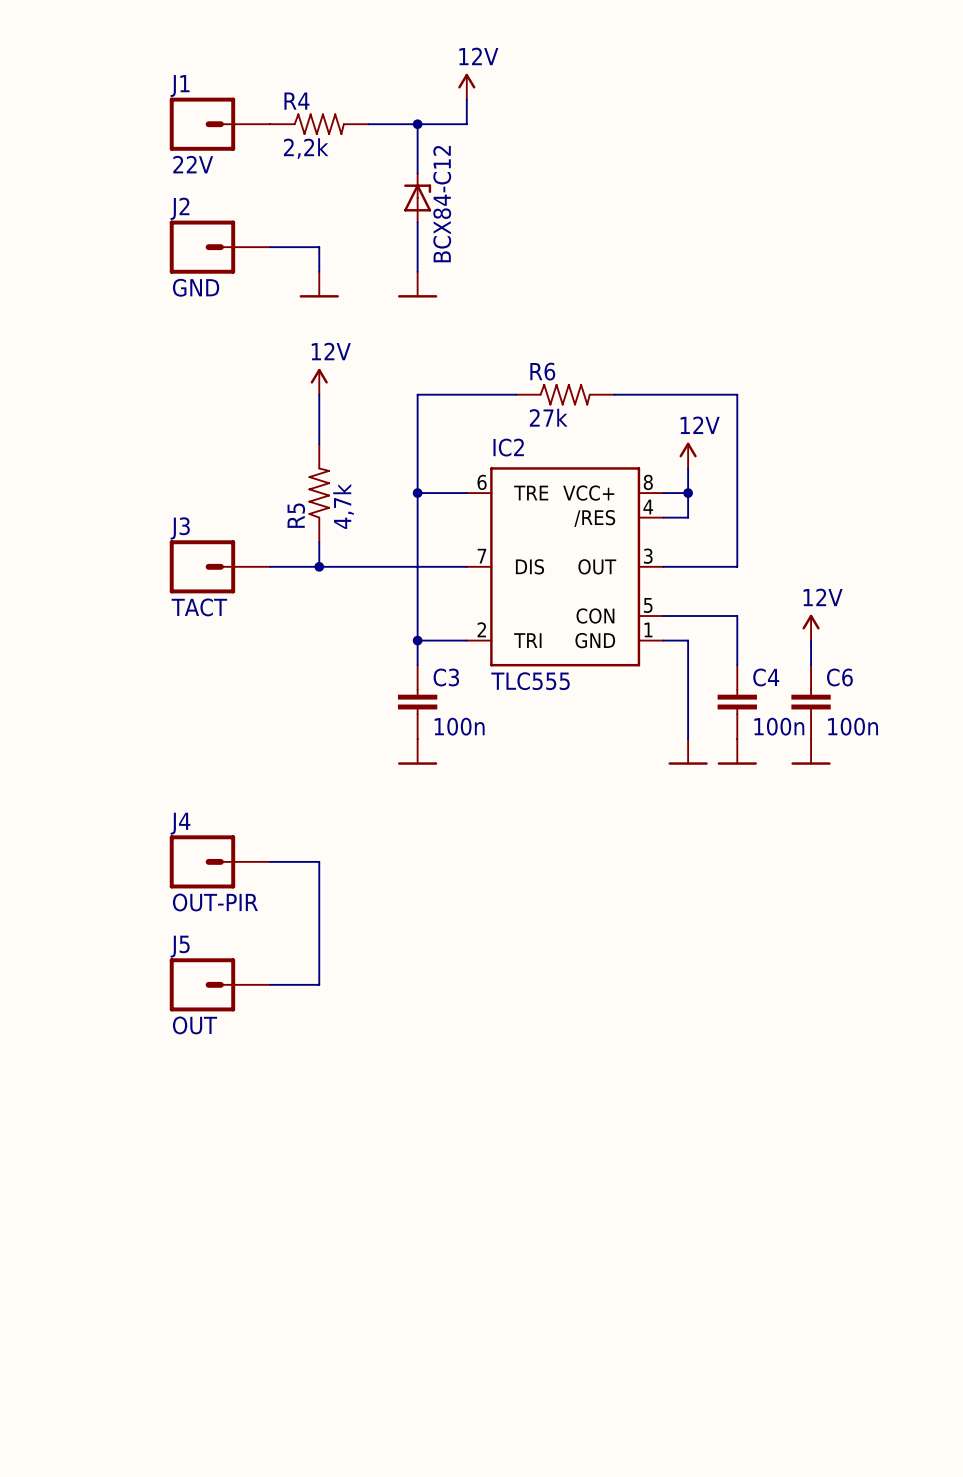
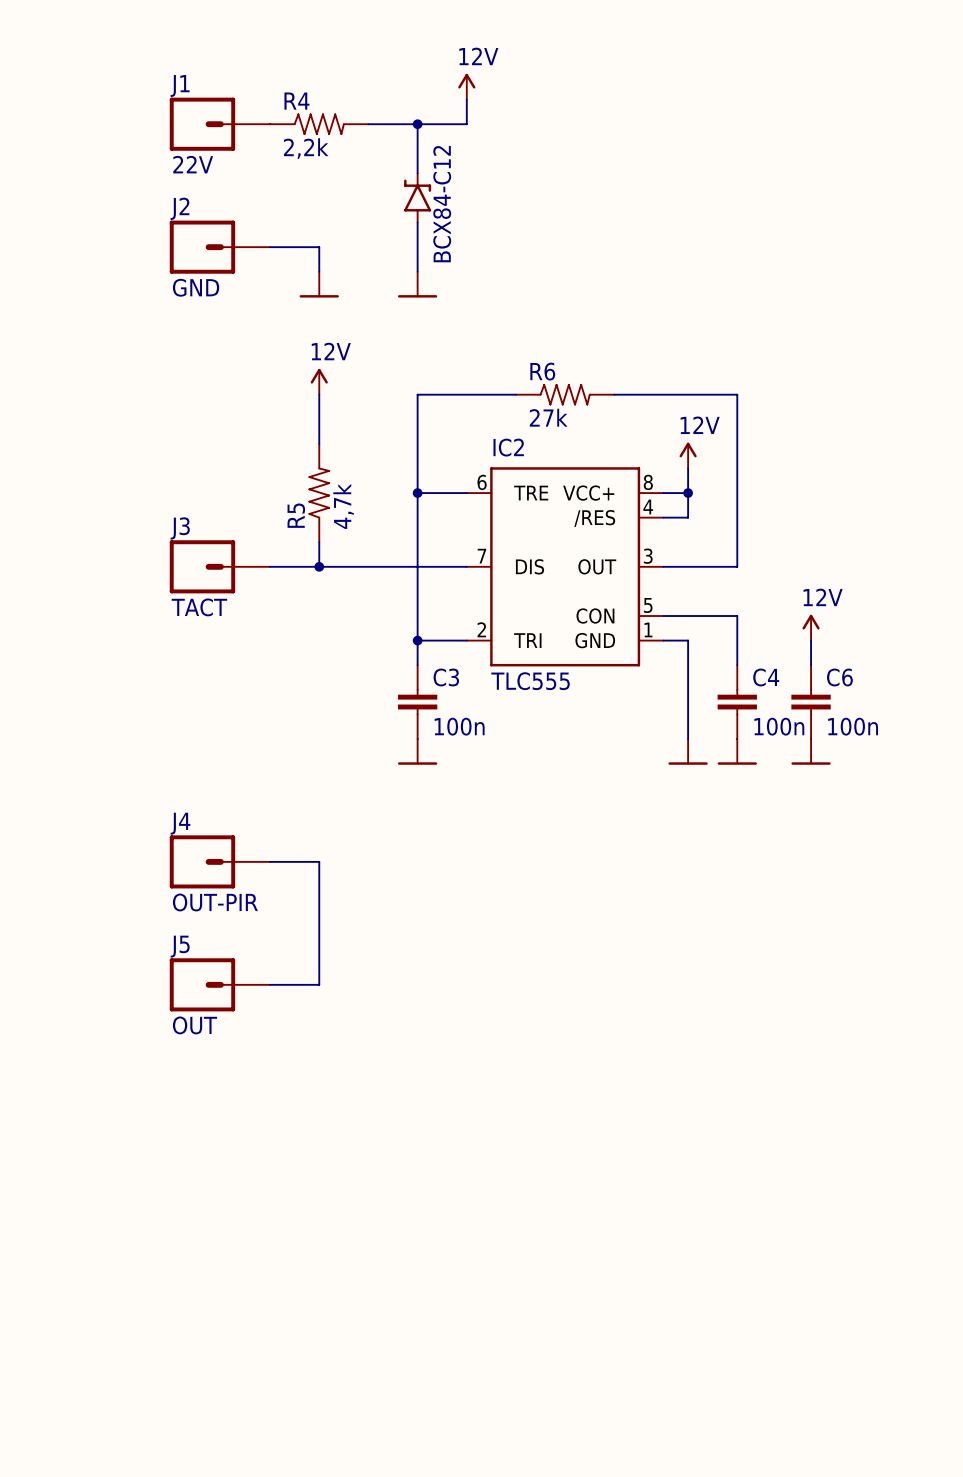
part symbol: [404, 173, 432, 223] -> [404, 172, 432, 224]

